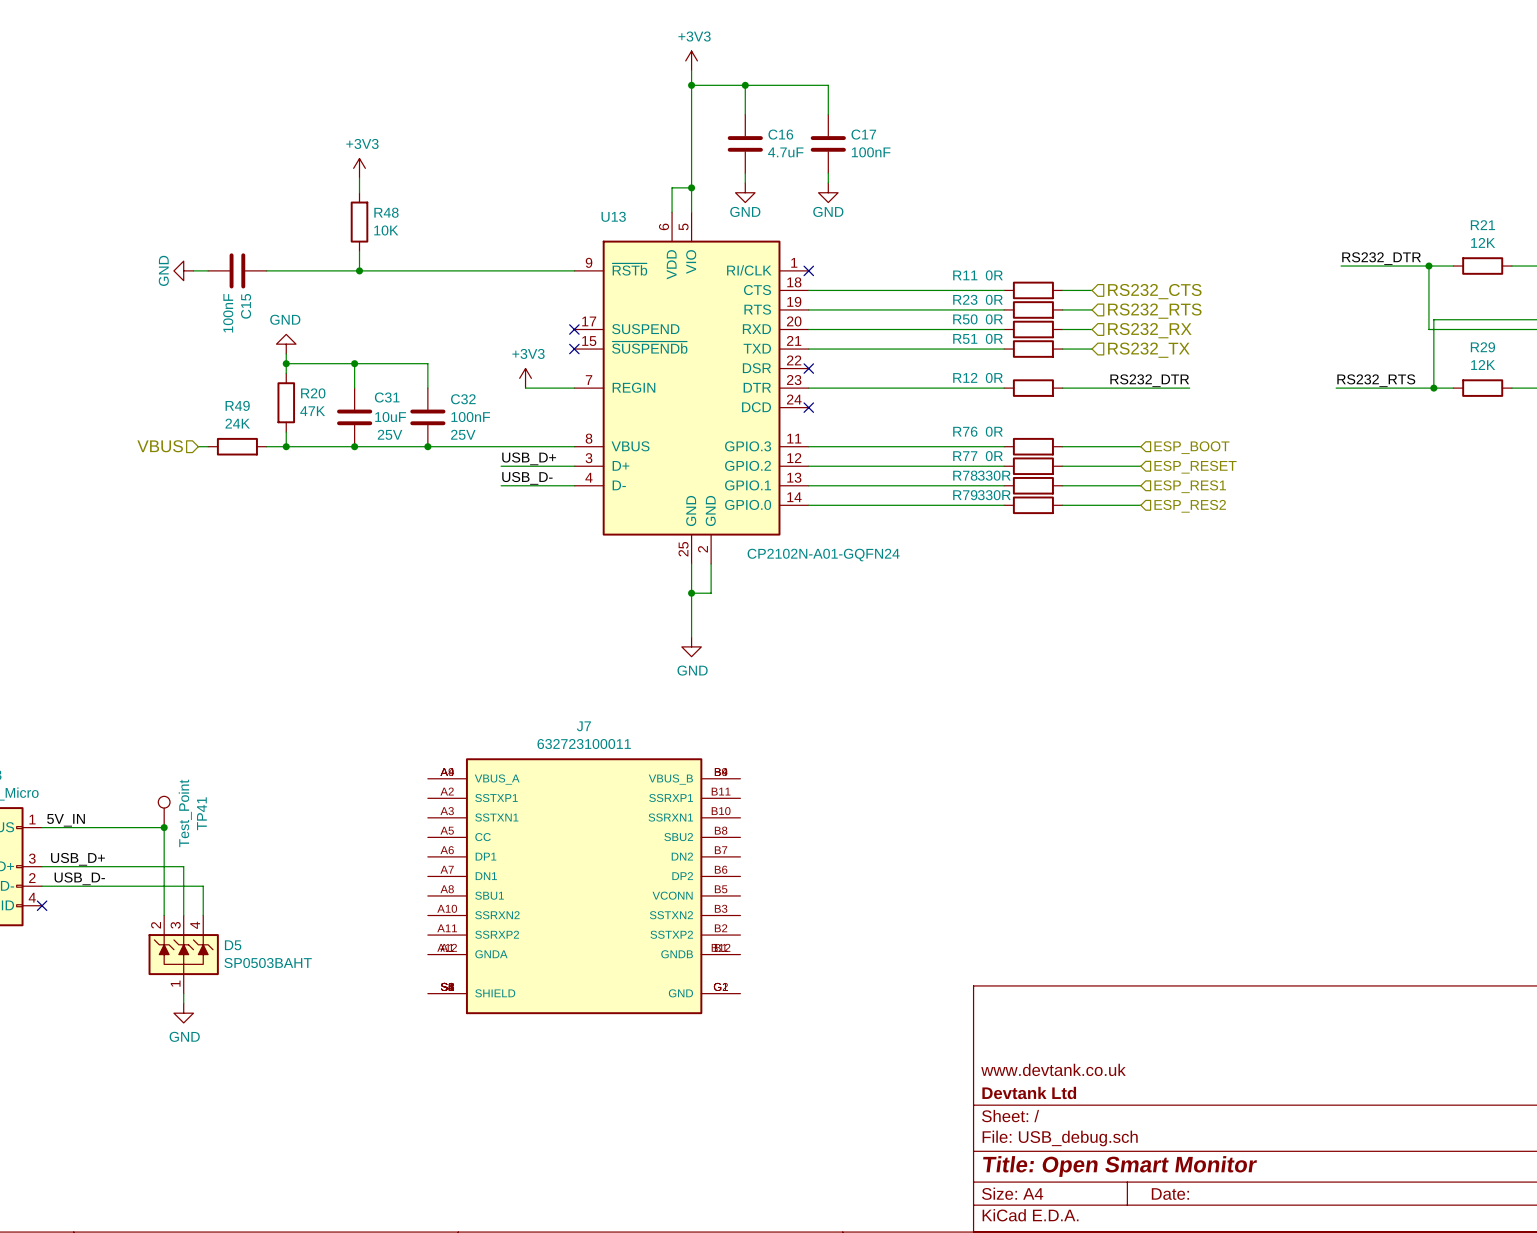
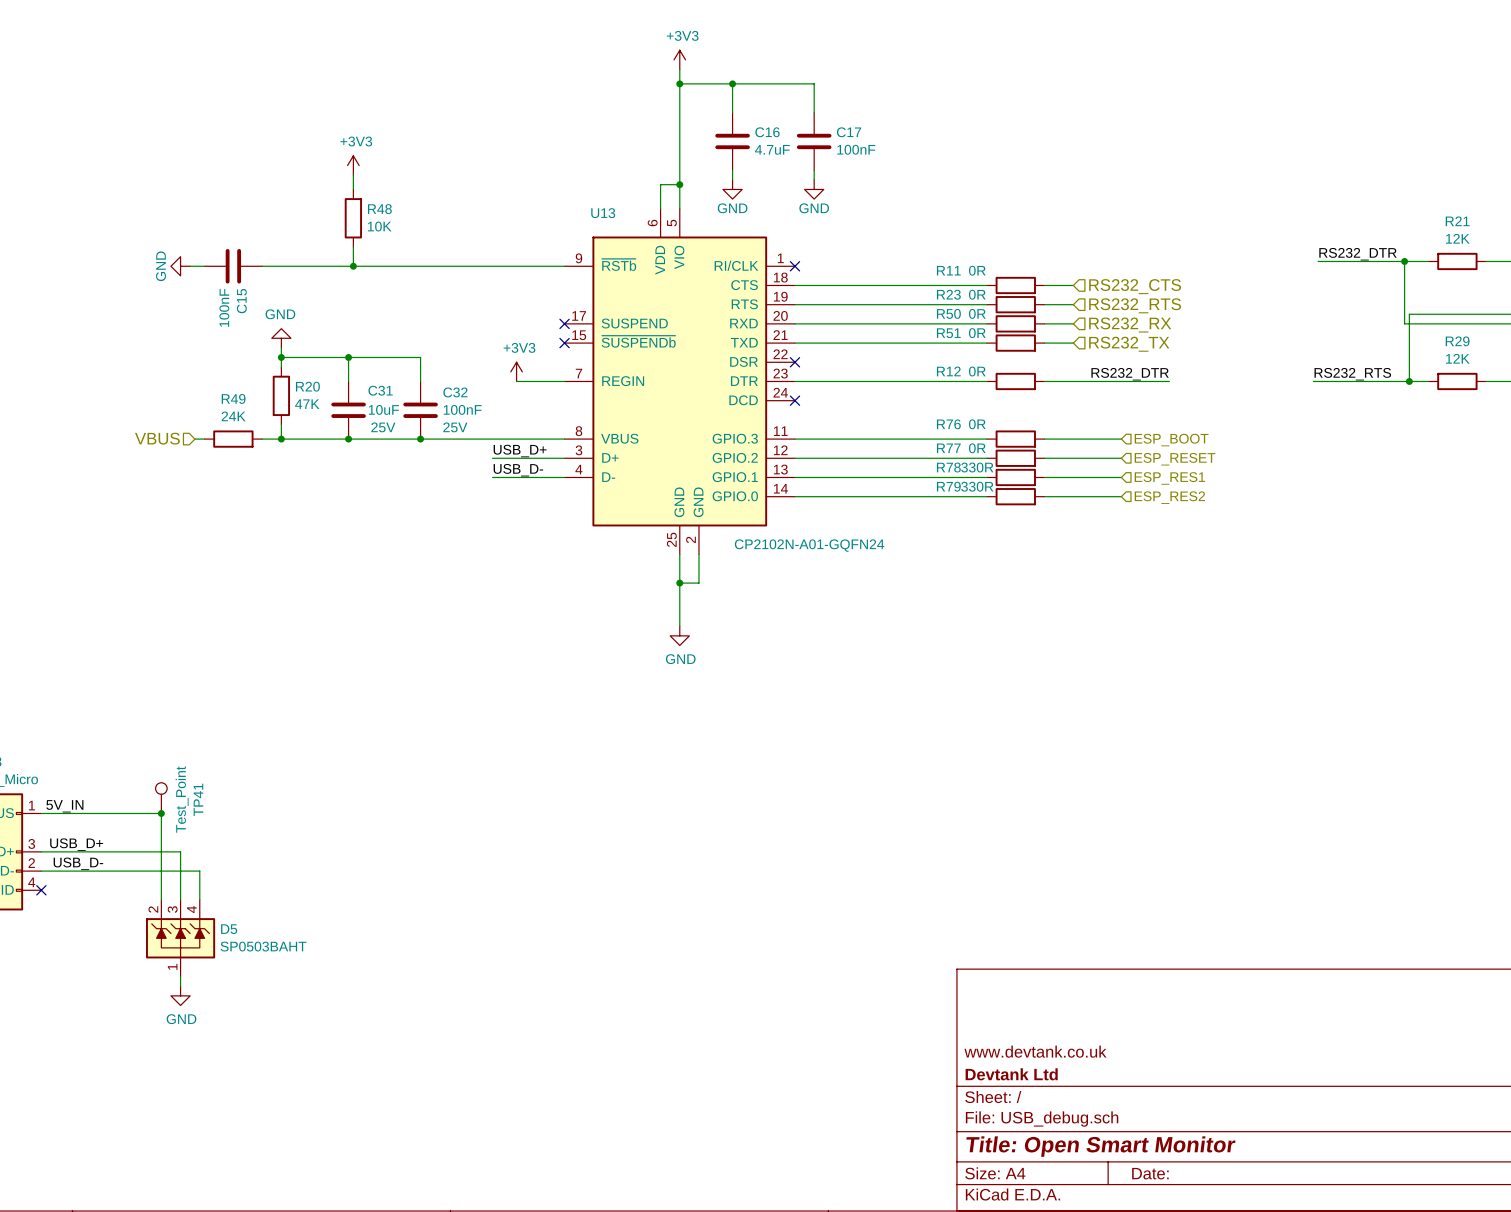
J7: 632723100011 (584, 886) -> none

